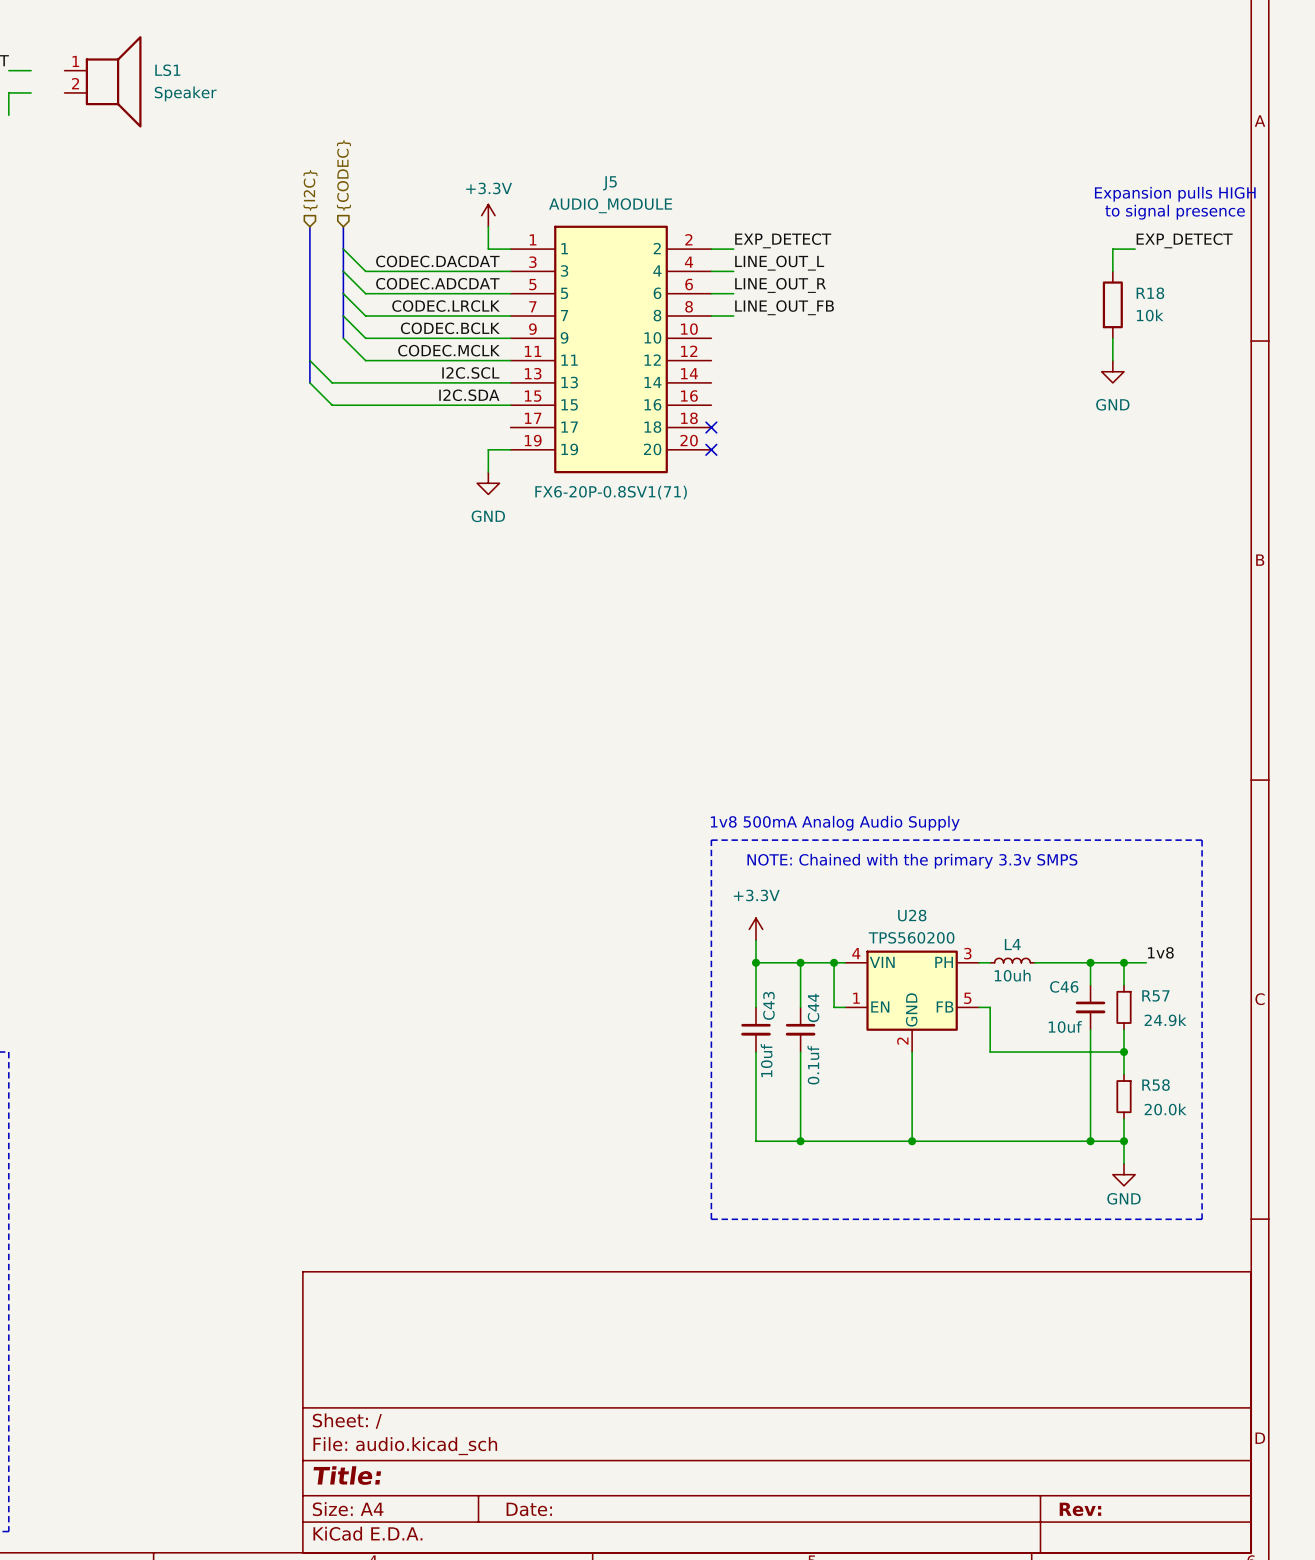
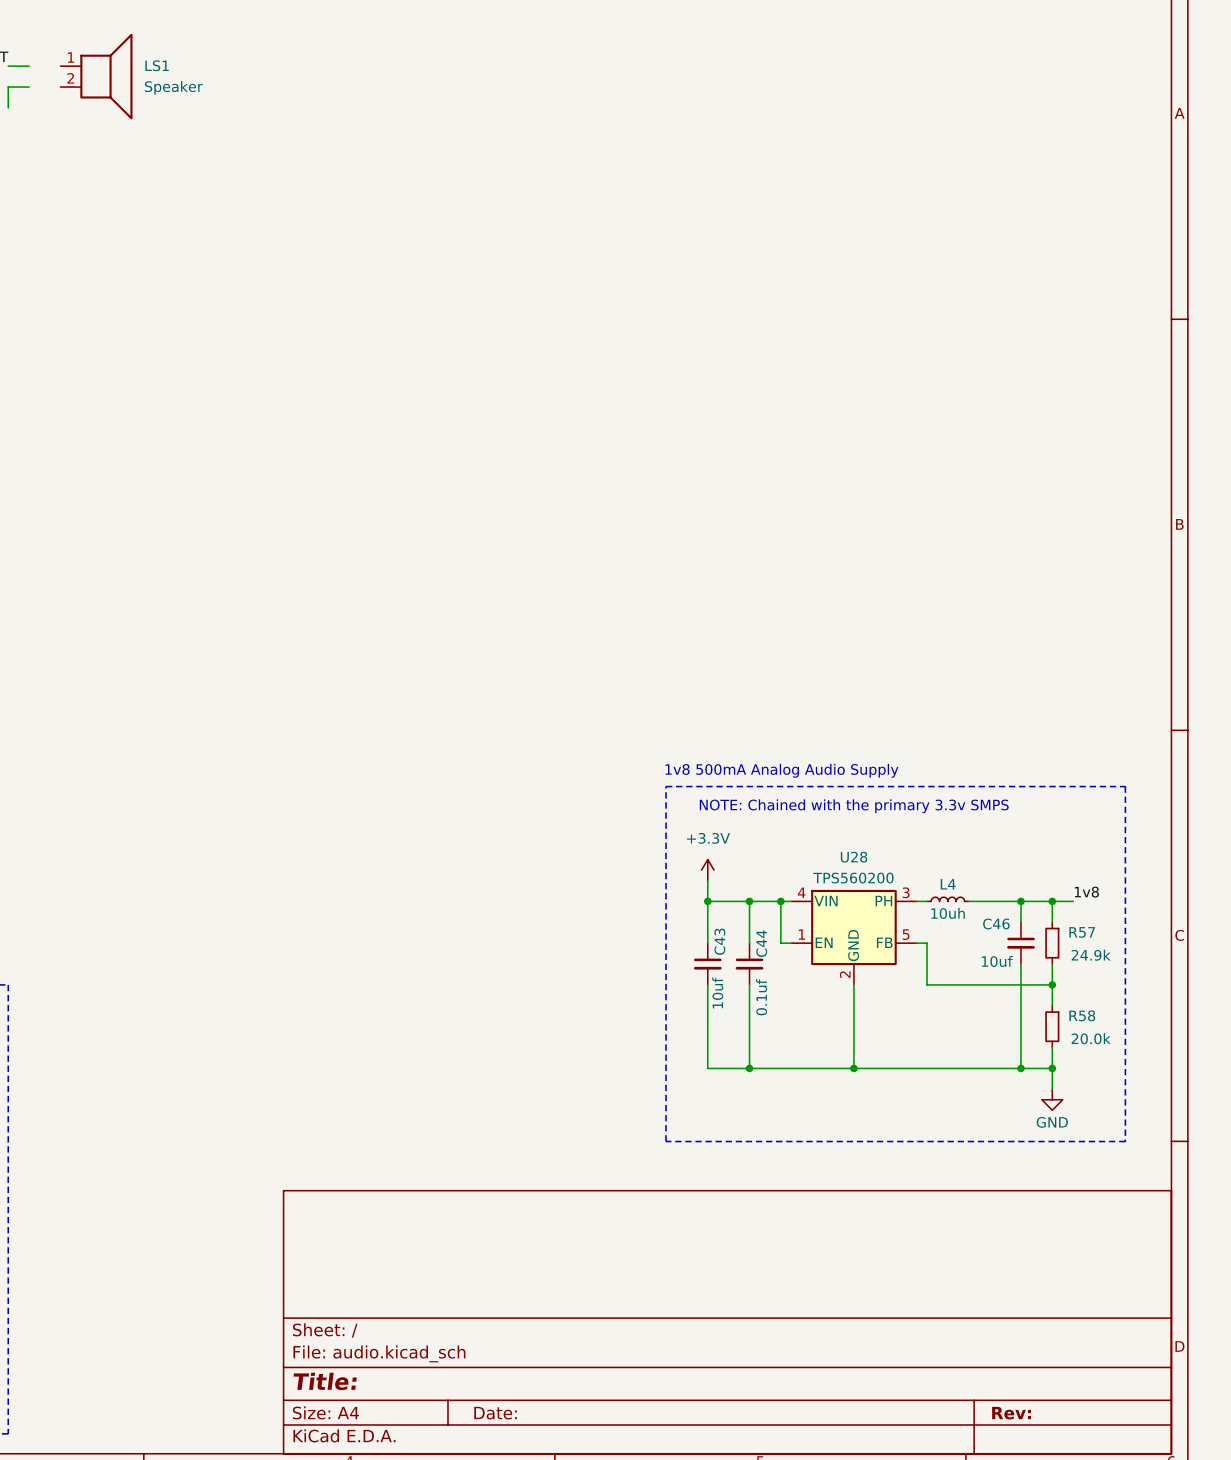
hierarchical label: {CODEC} (343, 175) -> none
hierarchical label: {I2C} (310, 190) -> none
text: Expansion pulls HIGH (1175, 194) -> none
text: to signal presence (1175, 212) -> none
power symbol: +3.3V (488, 215) -> none
bus: (309, 226) (309, 382) -> none
bus: (343, 226) (343, 338) -> none
wire: (488, 226) (488, 249) (510, 249) -> none
label: EXP_DETECT (783, 240) -> none
label: EXP_DETECT (1184, 240) -> none
wire: (343, 249) (365, 271) (510, 271) -> none
wire: (711, 249) (733, 249) -> none
wire: (1135, 249) (1112, 249) (1112, 271) -> none
label: CODEC.DACDAT (437, 261) -> none
label: LINE_OUT_L (779, 263) -> none
wire: (343, 271) (365, 293) (510, 293) -> none
wire: (711, 271) (733, 271) -> none
label: CODEC.ADCDAT (437, 283) -> none
label: LINE_OUT_R (780, 285) -> none
wire: (343, 293) (365, 316) (510, 316) -> none
wire: (711, 293) (733, 293) -> none
R18: 10k (1112, 304) -> none
label: CODEC.LRCLK (446, 306) -> none
label: LINE_OUT_FB (784, 307) -> none
wire: (343, 316) (365, 338) (510, 338) -> none
wire: (711, 316) (733, 316) -> none
label: CODEC.BCLK (450, 328) -> none
wire: (343, 338) (365, 360) (510, 360) -> none
wire: (1112, 338) (1112, 360) -> none
J5: AUDIO_MODULE (611, 349) -> none
label: CODEC.MCLK (449, 350) -> none
wire: (309, 360) (332, 382) (510, 382) -> none
power symbol: GND (1112, 371) -> none
label: I2C.SCL (470, 372) -> none
wire: (309, 382) (332, 405) (510, 405) -> none
label: I2C.SDA (469, 395) -> none
no-connect mark: (711, 427) -> none
wire: (510, 449) (488, 449) (488, 472) -> none
no-connect mark: (711, 449) -> none
power symbol: GND (488, 483) -> none

